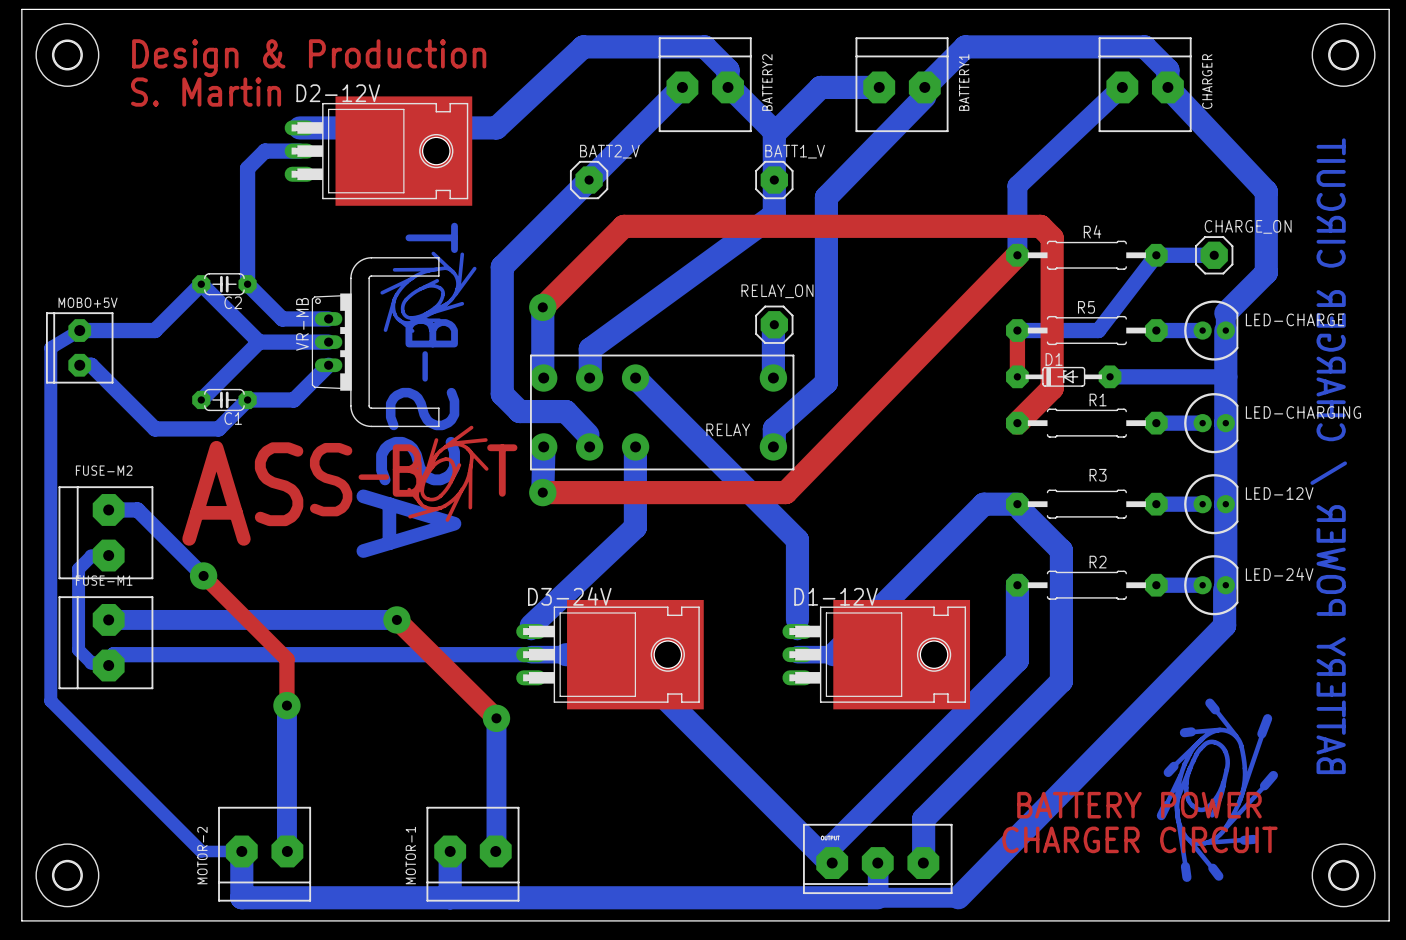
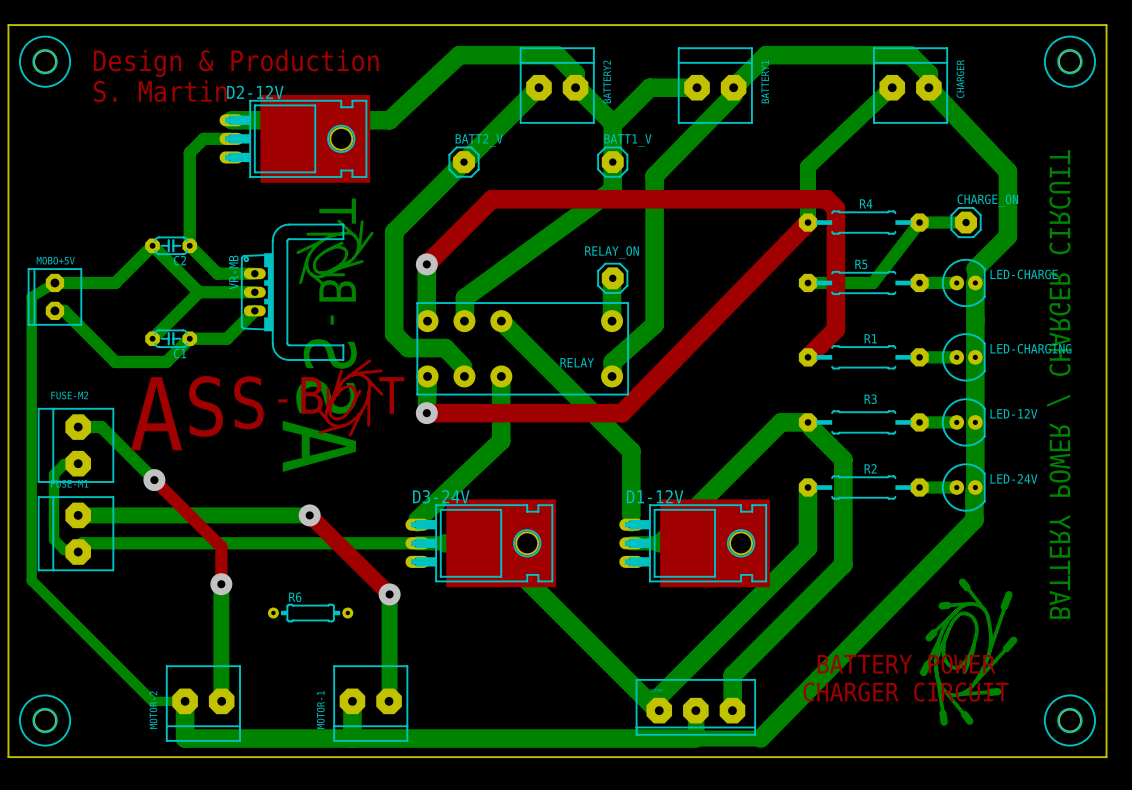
top track: (1017, 330) (1017, 376) -> none
D1: (1063, 376) -> none
bottom track: (1110, 376) (1225, 376) -> none
R6: none -> (310, 613)

